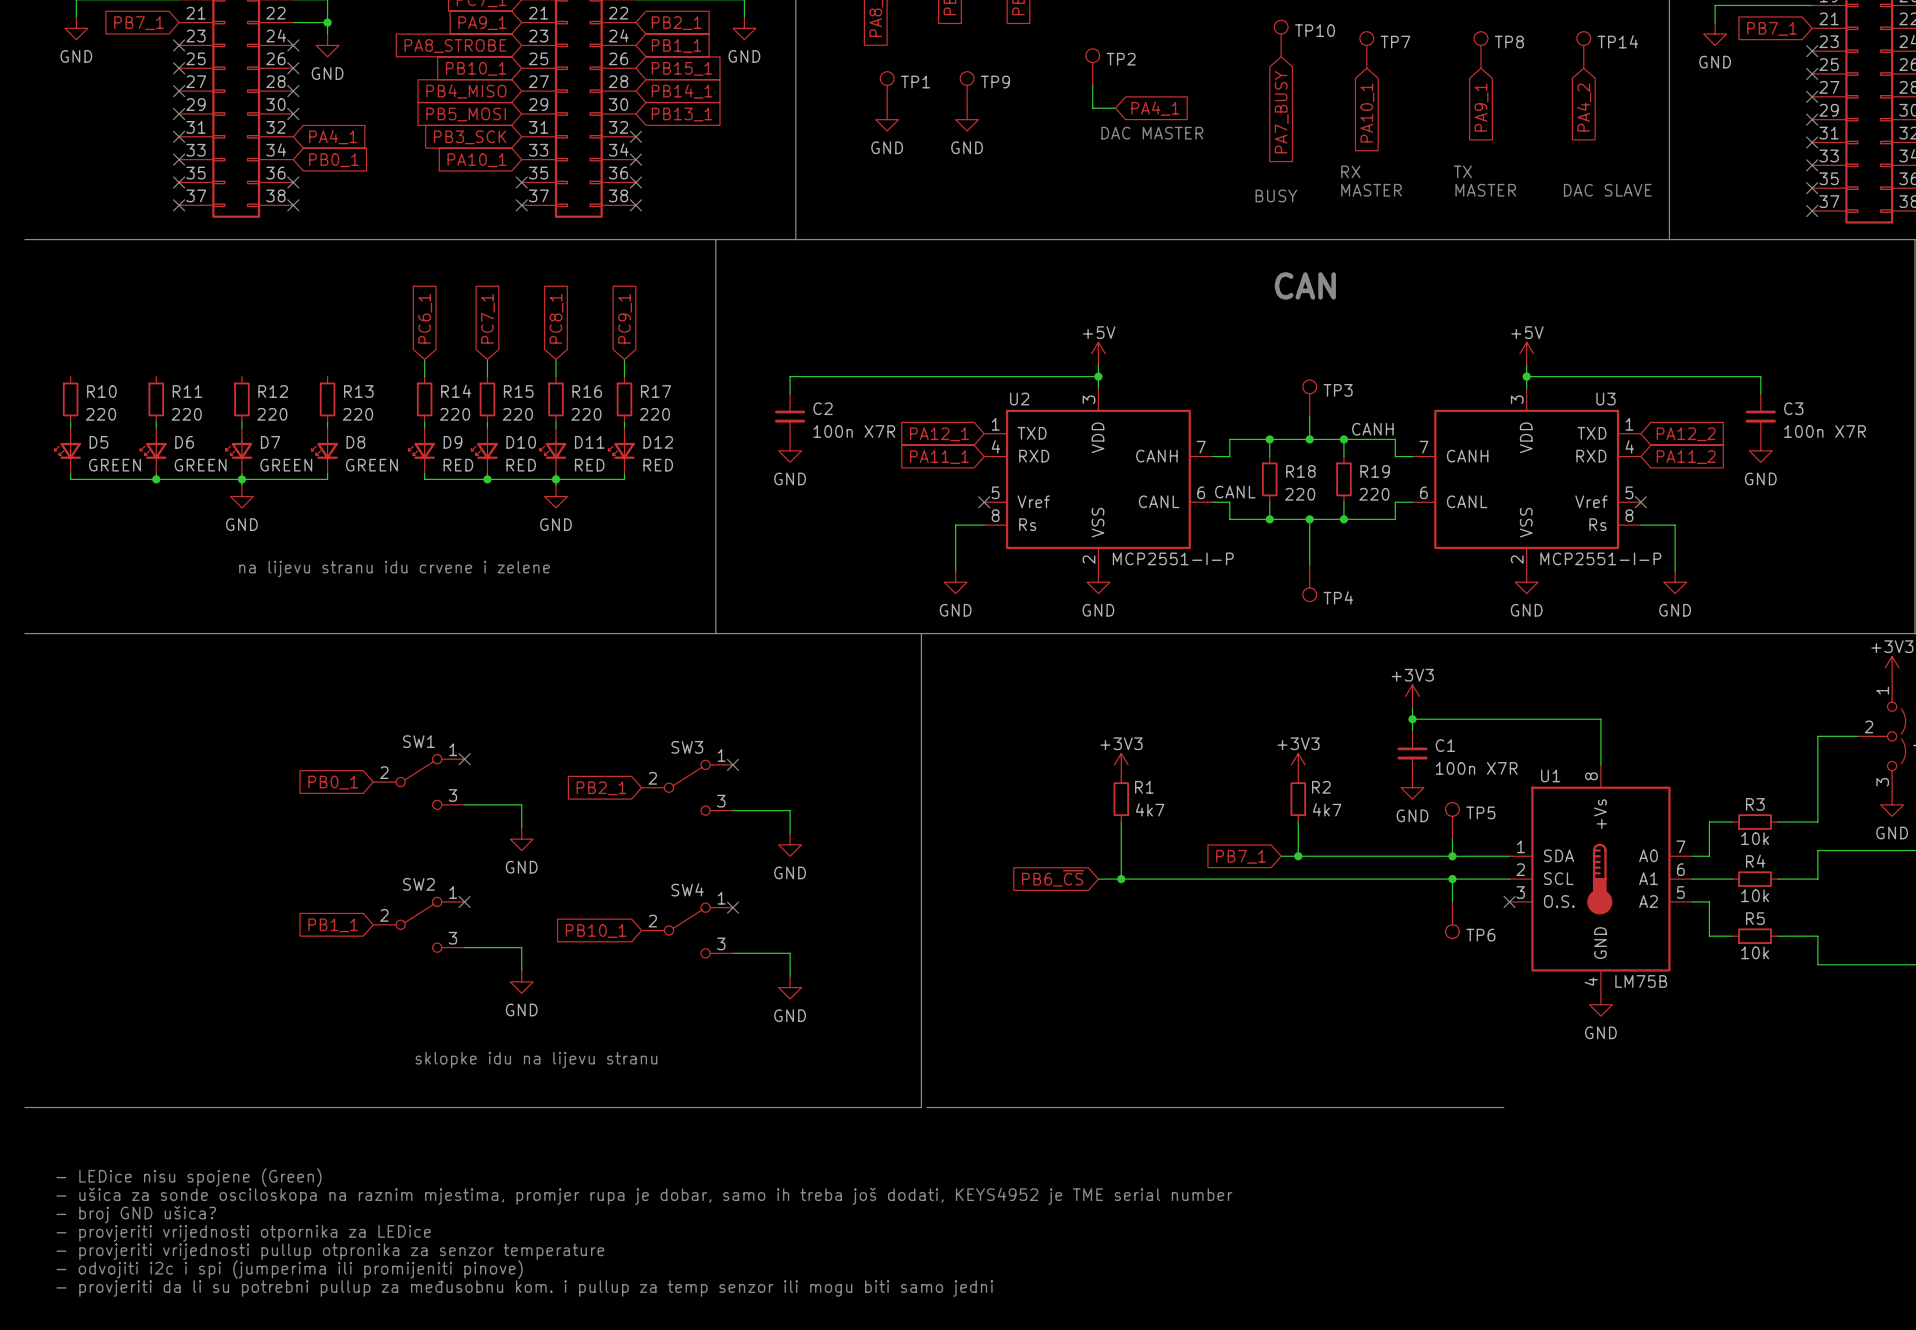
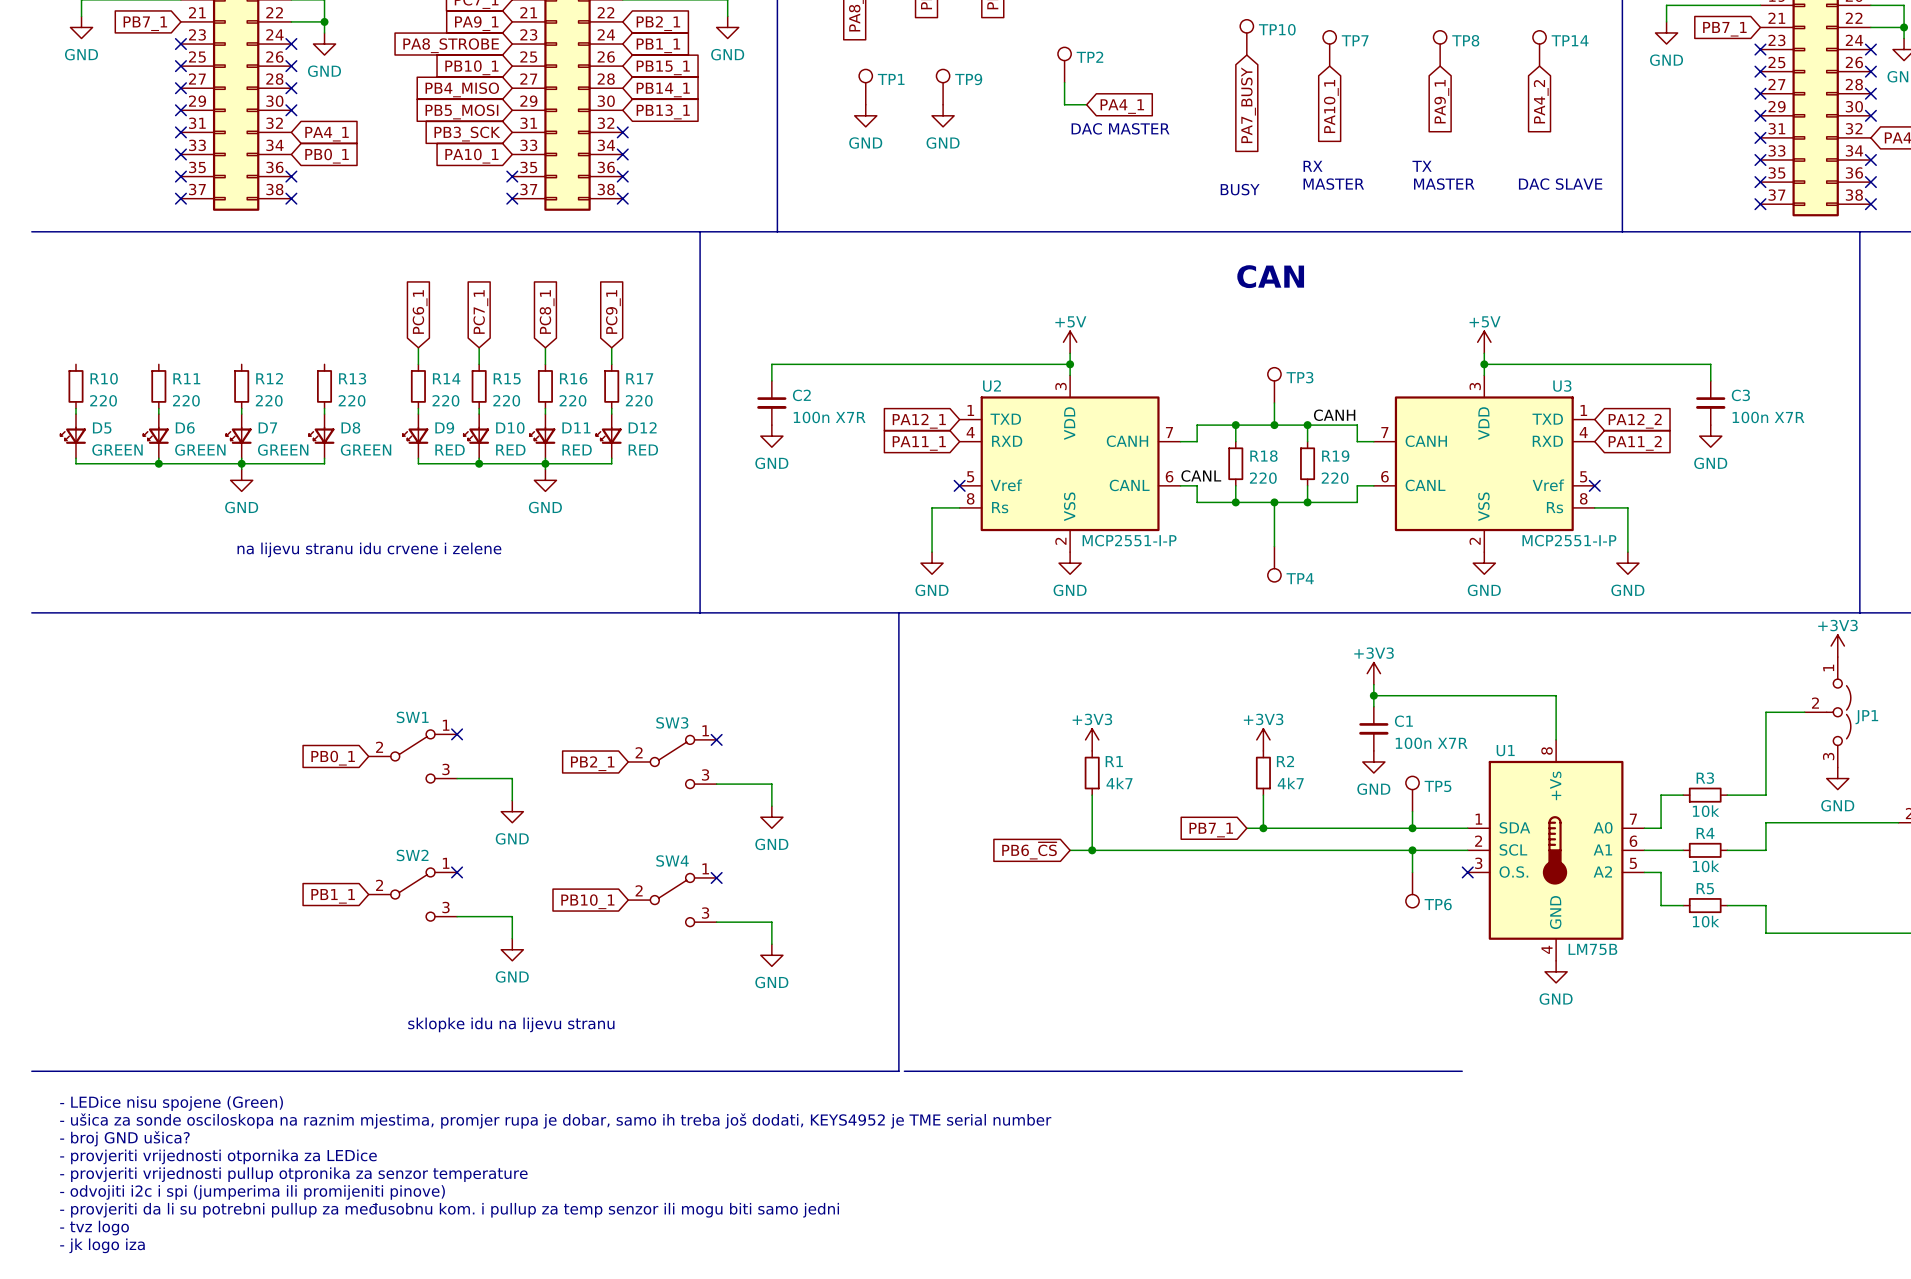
text: none -> - LEDice nisu spojene (Green) (171, 1103)
text: none -> - ušica za sonde osciloskopa na raznim mjestima, promjer rupa je dobar, samo ih treba još dodati, KEYS4952 je TME serial number (555, 1121)
text: - LEDice nisu spojene (Green) (188, 1177) -> - broj GND ušica? (124, 1138)
text: - ušica za sonde osciloskopa na raznim mjestima, promjer rupa je dobar, samo ih treba još dodati, KEYS4952 je TME serial number (644, 1196) -> - provjeriti vrijednosti otpornika za LEDice (218, 1156)
text: - broj GND ušica? (136, 1214) -> - provjeriti vrijednosti pullup otpronika za senzor temperature (293, 1174)
text: - provjeriti vrijednosti otpornika za LEDice (243, 1233) -> - odvojiti i2c i spi (jumperima ili promijeniti pinove) (252, 1192)
text: - provjeriti vrijednosti pullup otpronika za senzor temperature (330, 1251) -> - provjeriti da li su potrebni pullup za međusobnu kom. i pullup za temp senzor ili mogu biti samo jedni (449, 1210)
text: - odvojiti i2c i spi (jumperima ili promijeniti pinove) (289, 1269) -> - tvz logo (94, 1228)
text: - provjeriti da li su potrebni pullup za međusobnu kom. i pullup za temp senzor ili mogu biti samo jedni (524, 1288) -> - jk logo iza (102, 1245)

